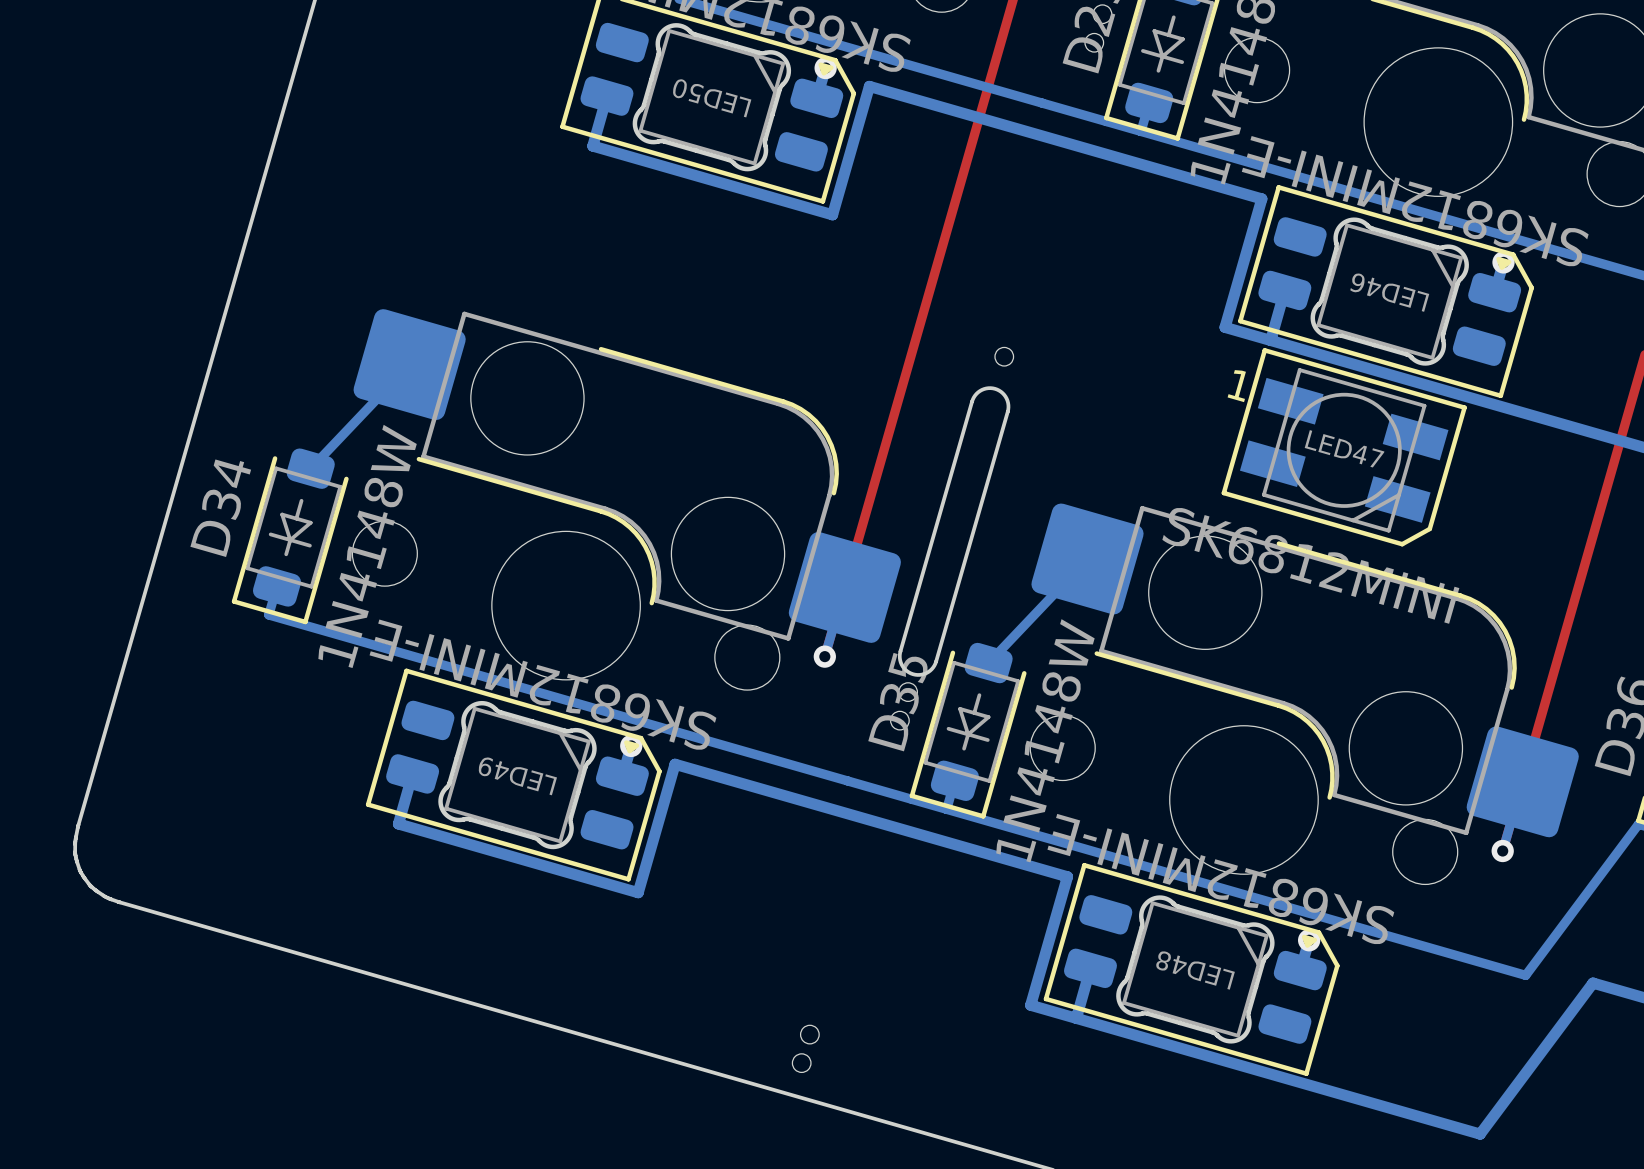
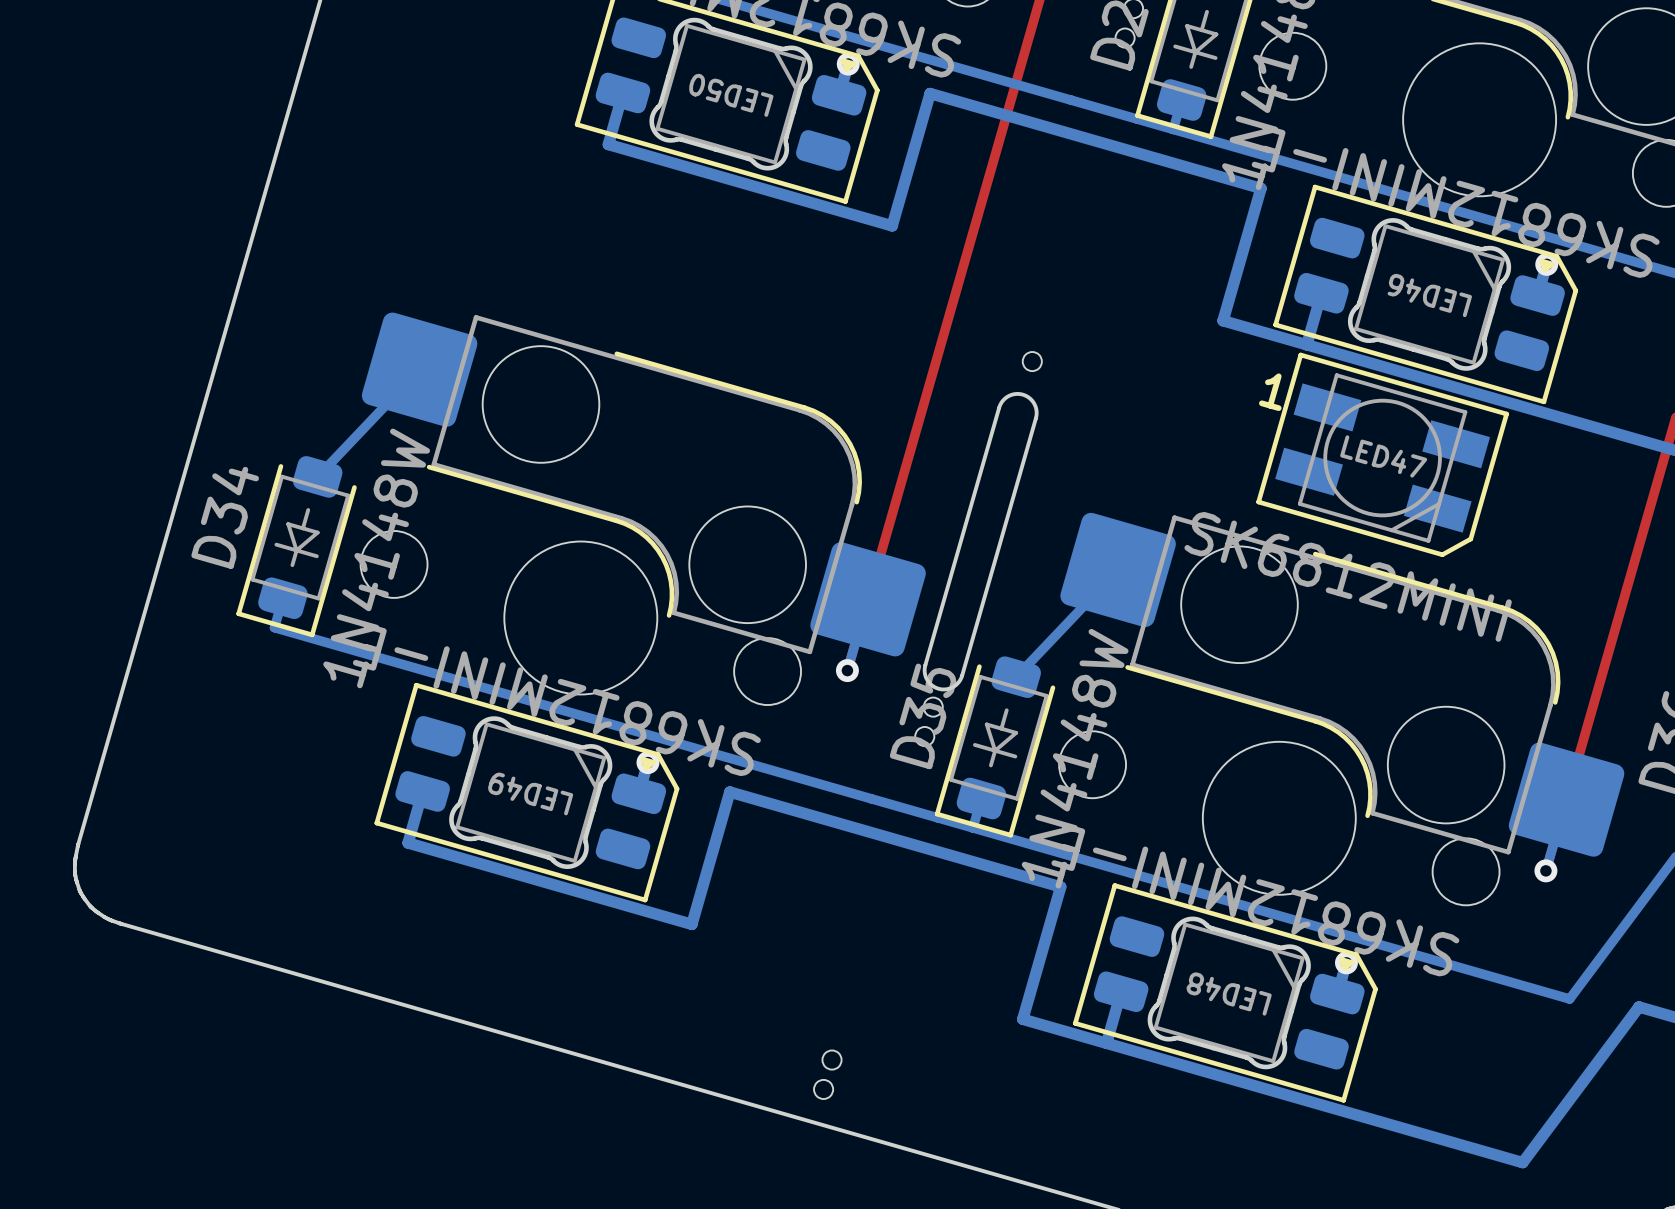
bottom track: (905, 96) (869, 86) (832, 214) -> (930, 93) (892, 225) (855, 215)
bottom track: (1226, 188) (1261, 198) (1225, 327) -> (1261, 188) (1223, 320) (1259, 331)
bottom track: (710, 774) (675, 764) (638, 892) -> (729, 792) (691, 924) (655, 913)
bottom track: (1031, 866) (1067, 876) (1030, 1005) -> (1060, 886) (1022, 1019) (1059, 1029)

